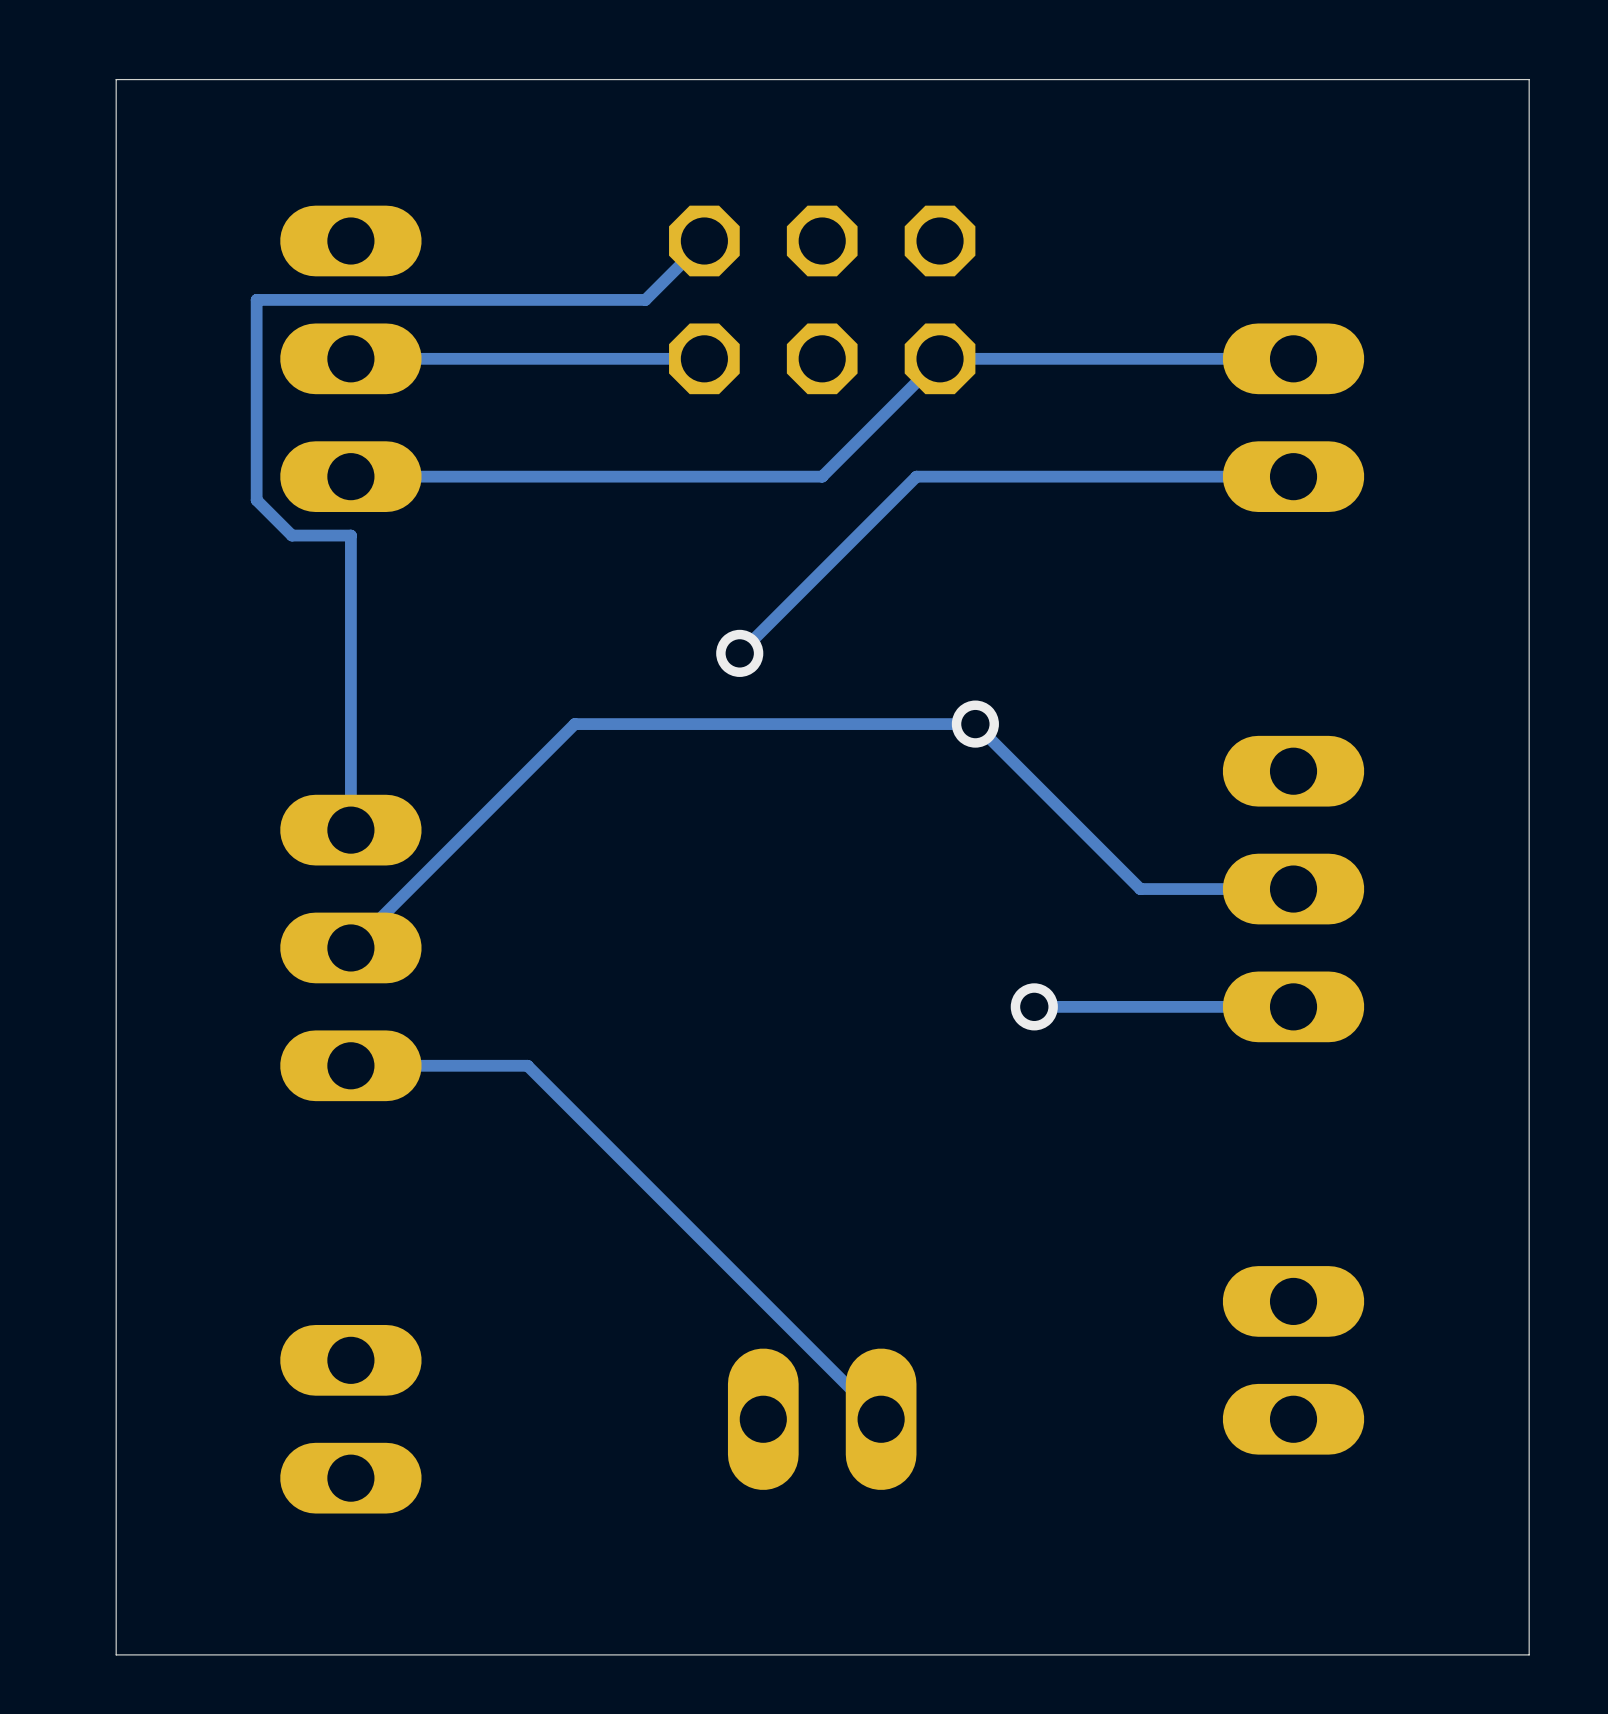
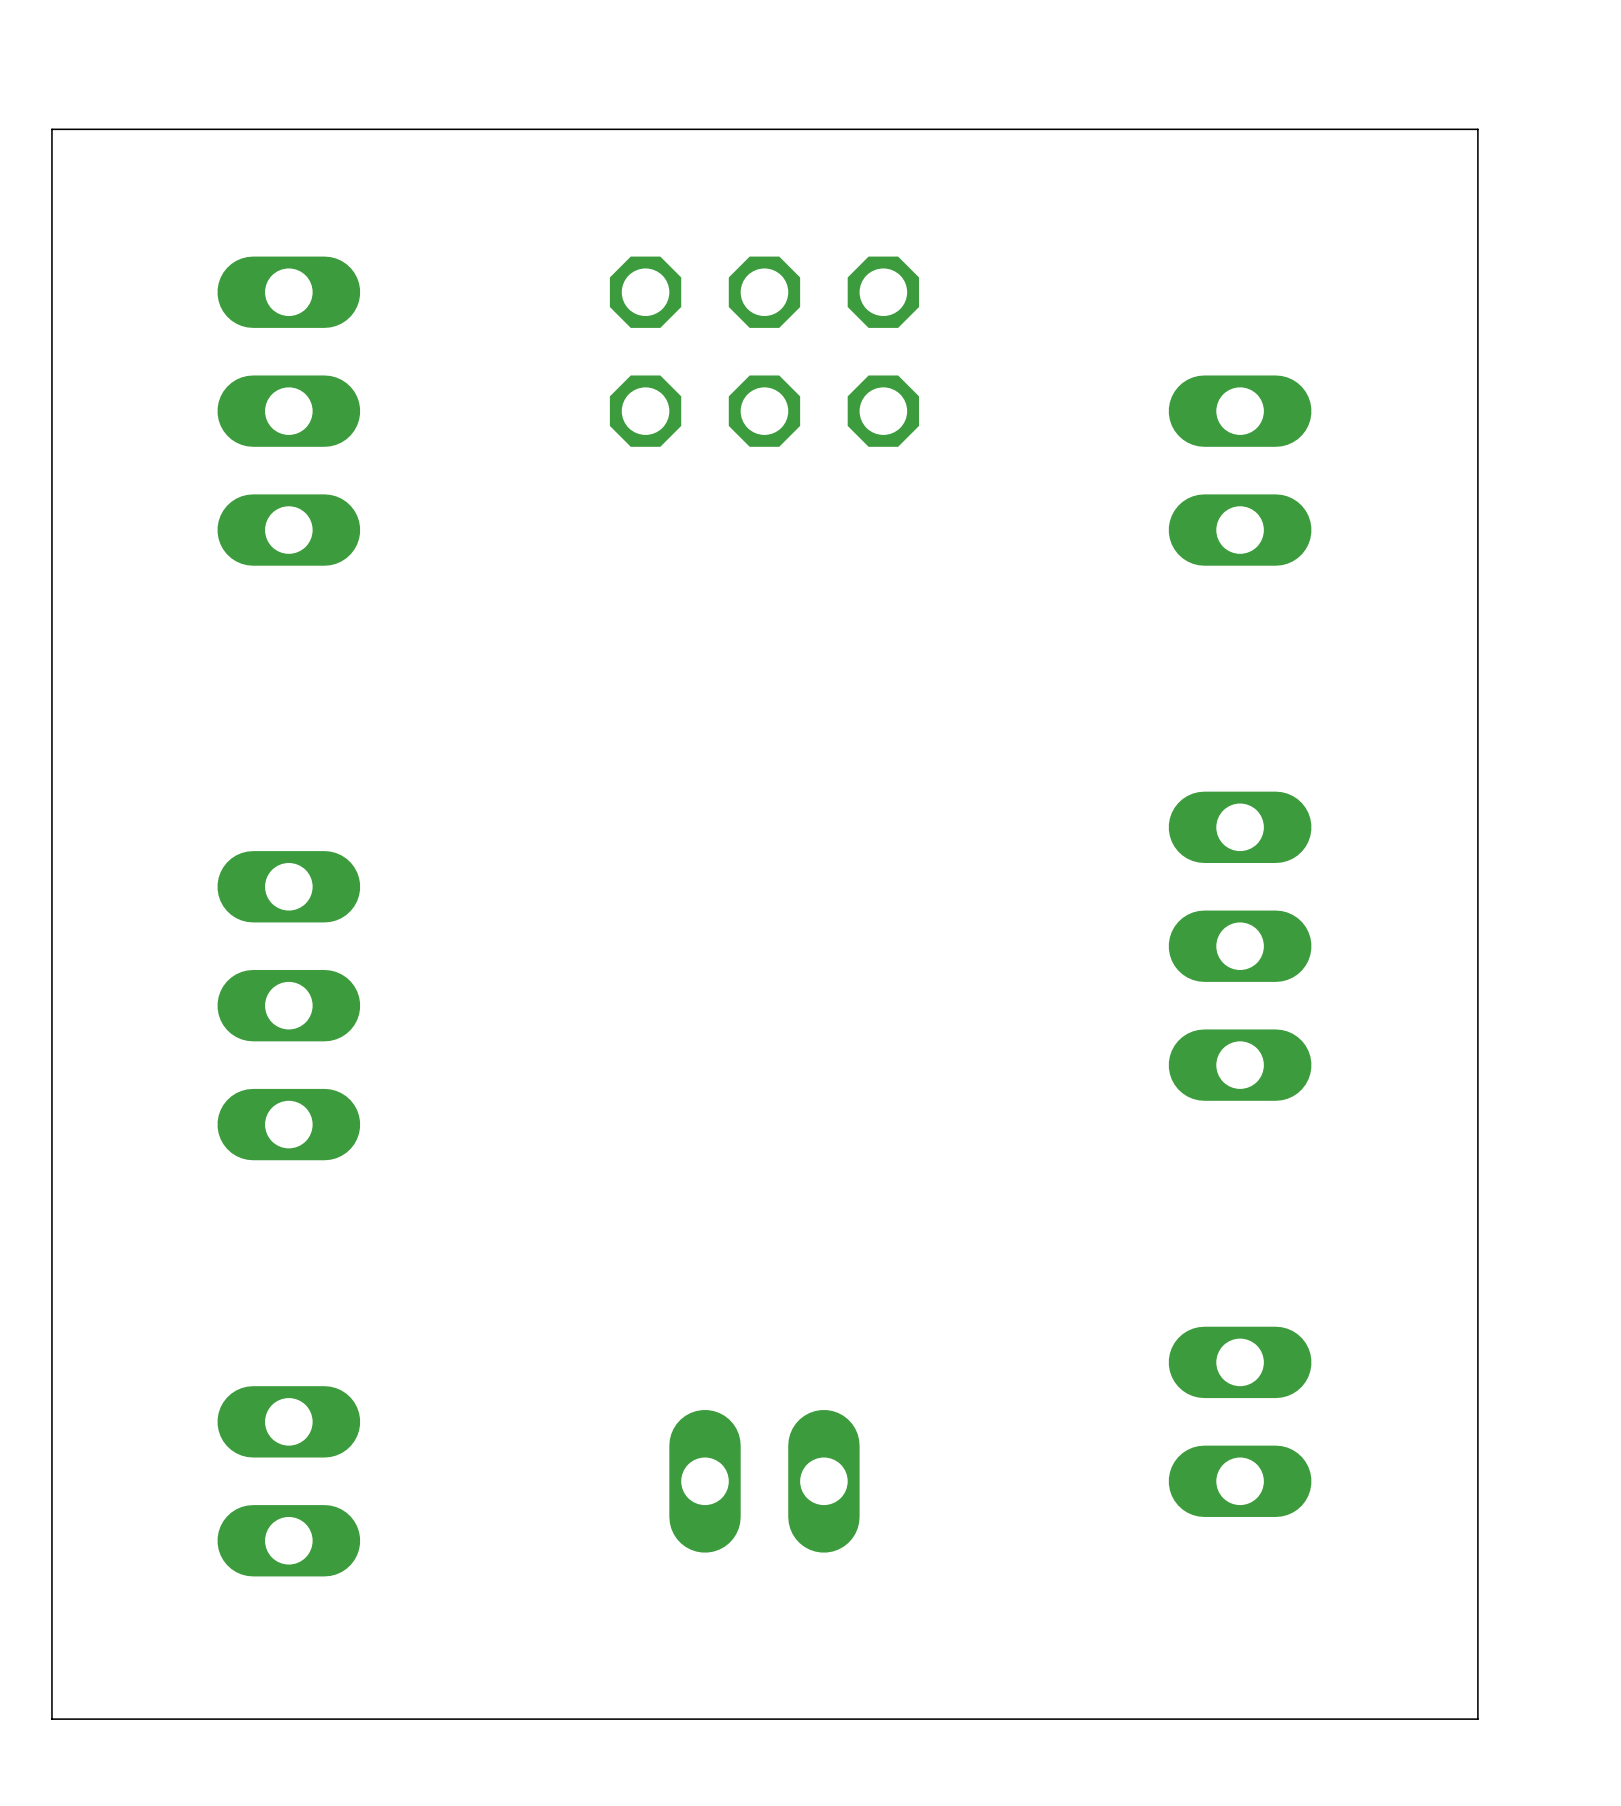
track: (704, 241) (645, 299) (256, 299) (256, 500) (292, 535) (350, 535) (350, 830) -> none
track: (704, 358) (350, 358) -> none
track: (1293, 358) (940, 358) (822, 476) (350, 476) -> none
track: (1293, 476) (916, 476) (739, 653) -> none
via: (739, 653) -> none
via: (975, 724) -> none
track: (1293, 889) (1140, 889) (975, 724) (574, 724) (350, 947) -> none
via: (1034, 1006) -> none
track: (1293, 1006) (1034, 1006) -> none
track: (350, 1065) (527, 1065) (881, 1419) -> none

